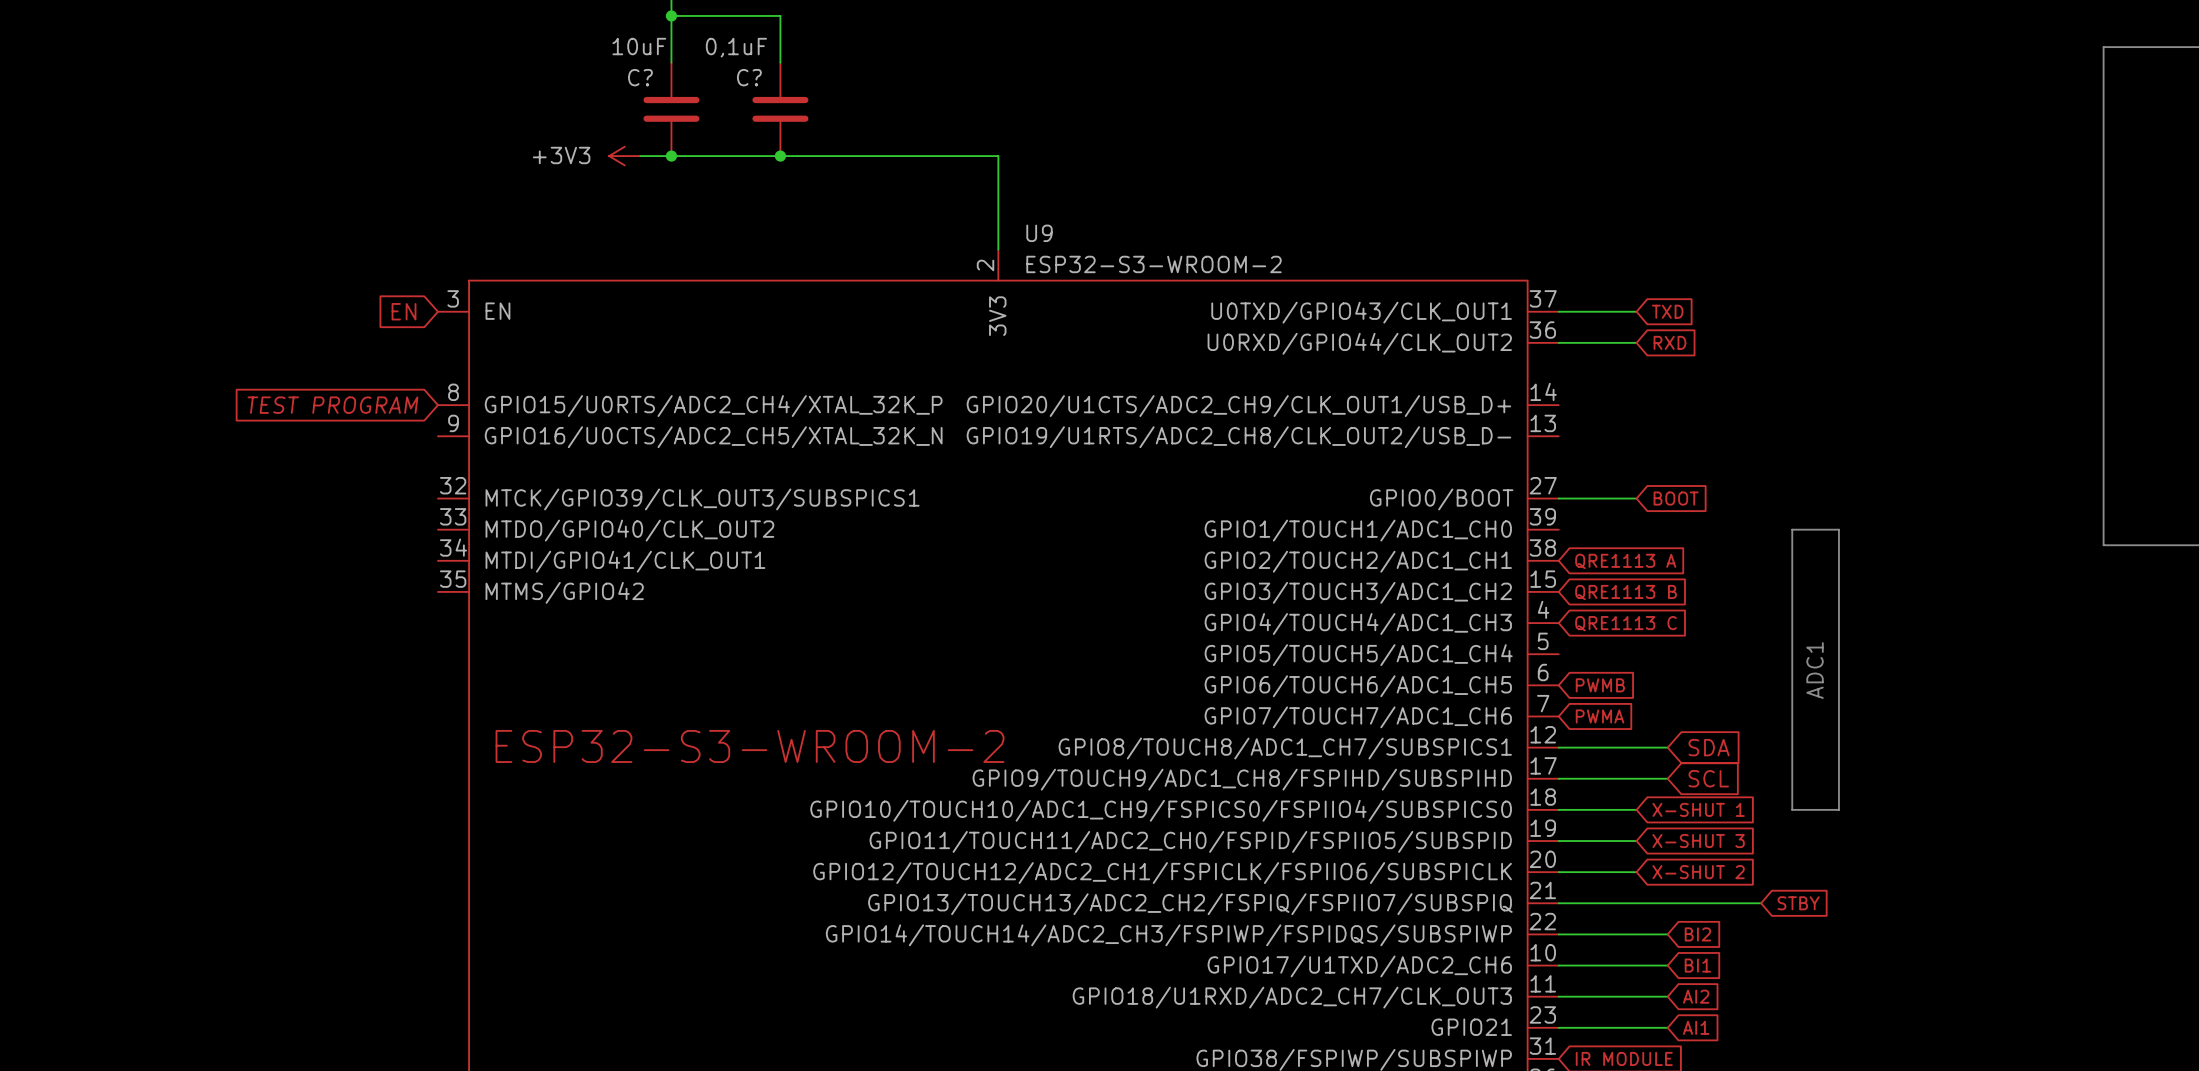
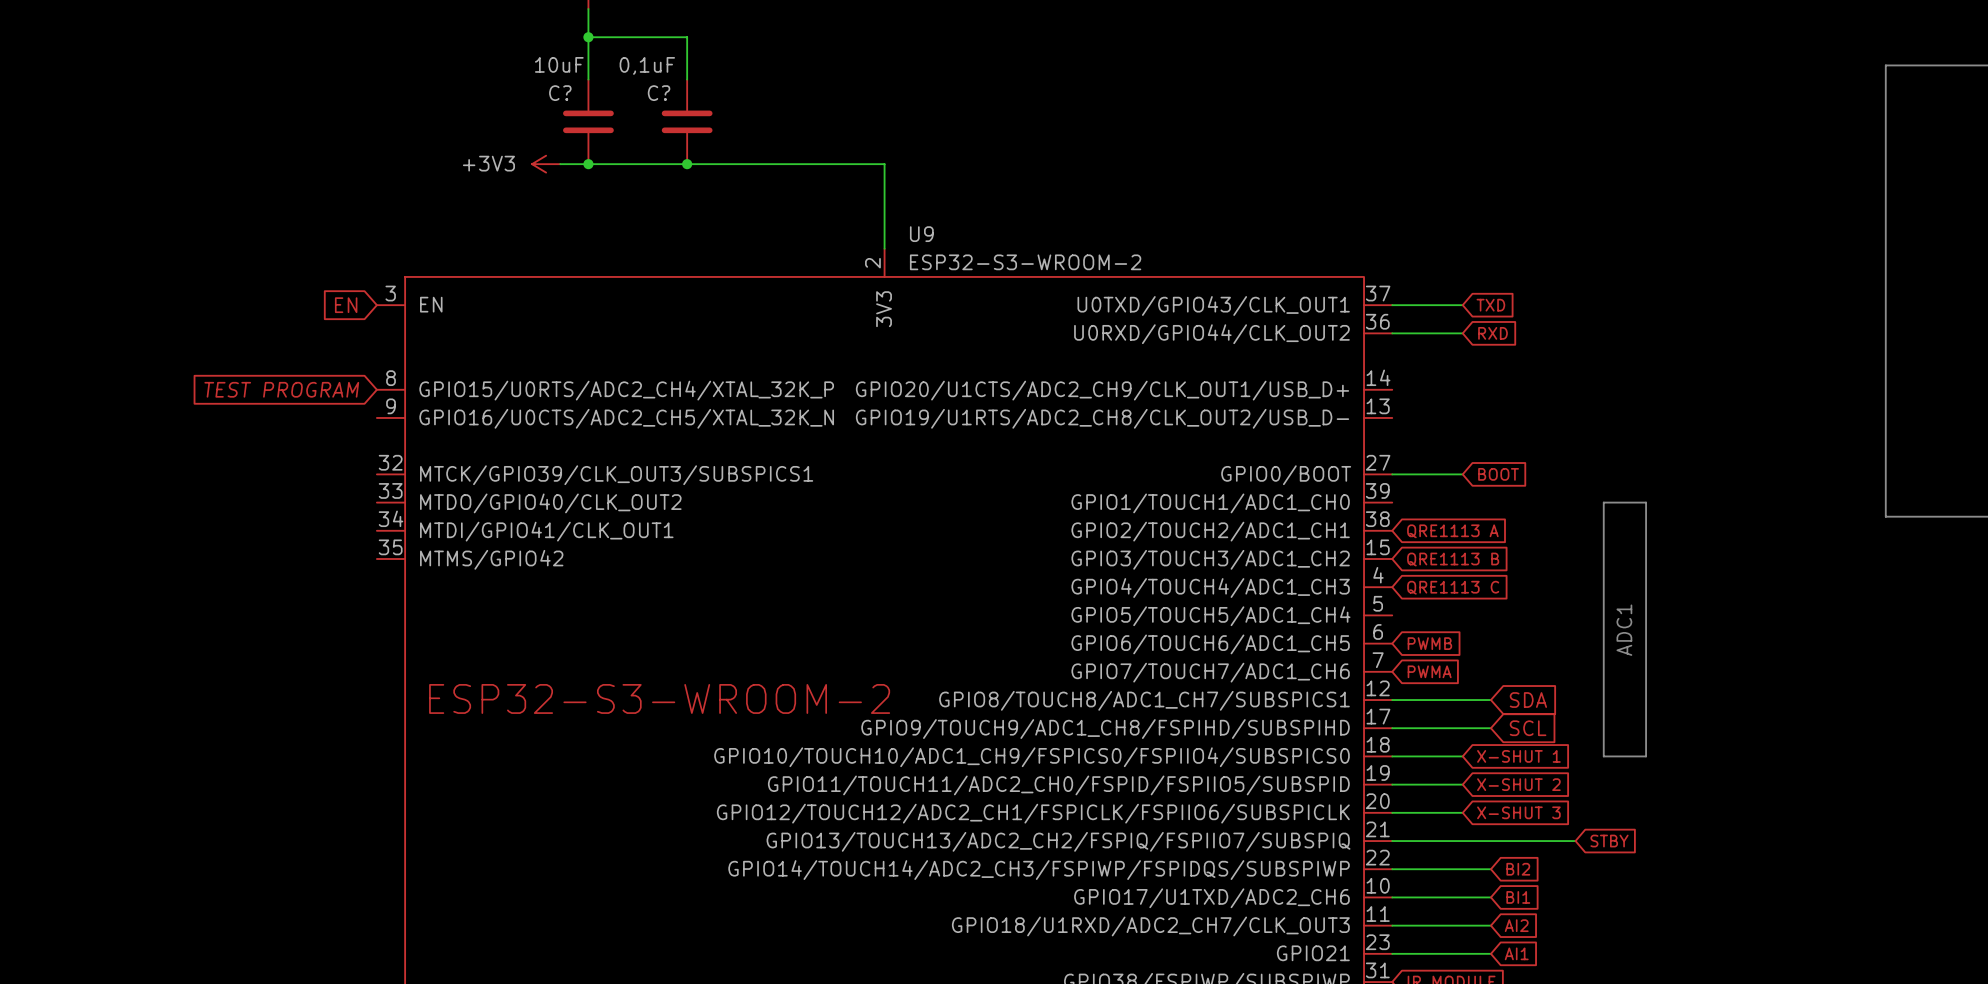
global label: X-SHUT 3 (1698, 841) -> X-SHUT 2 (1518, 784)
global label: X-SHUT 2 (1698, 872) -> X-SHUT 3 (1518, 812)

